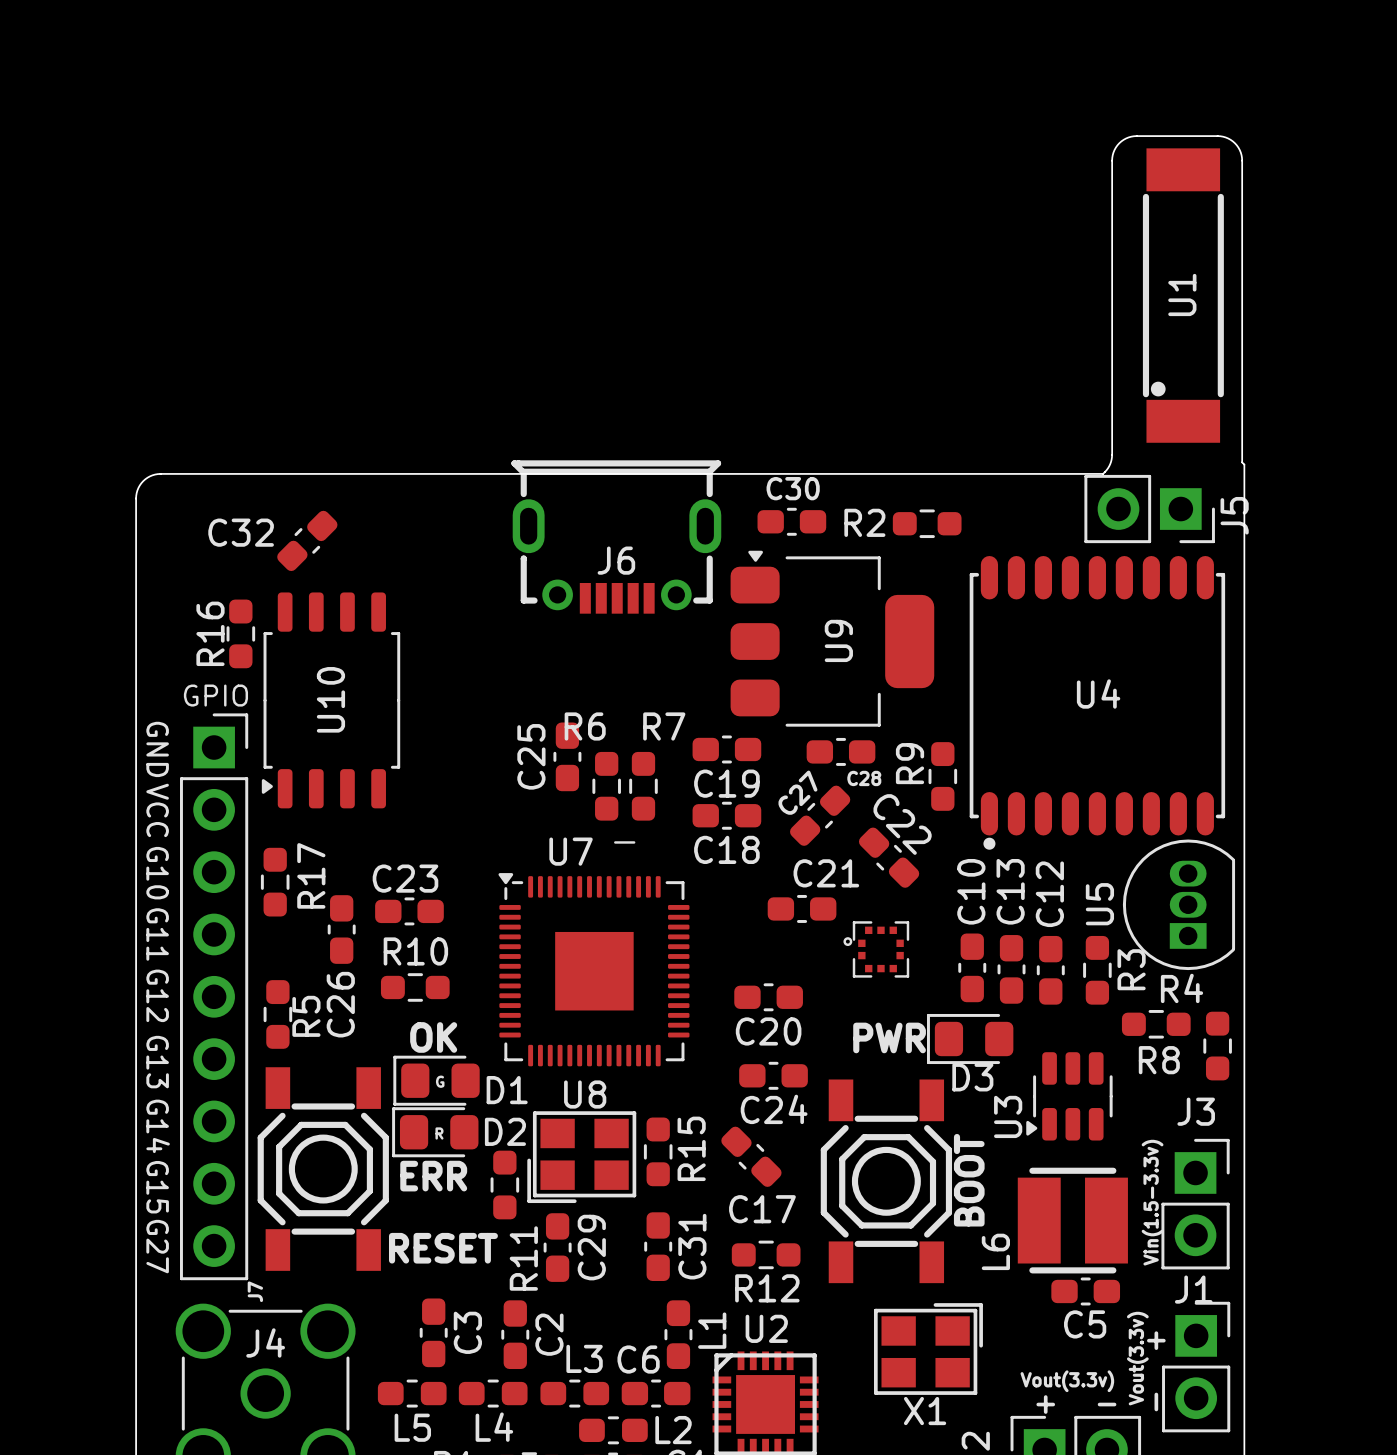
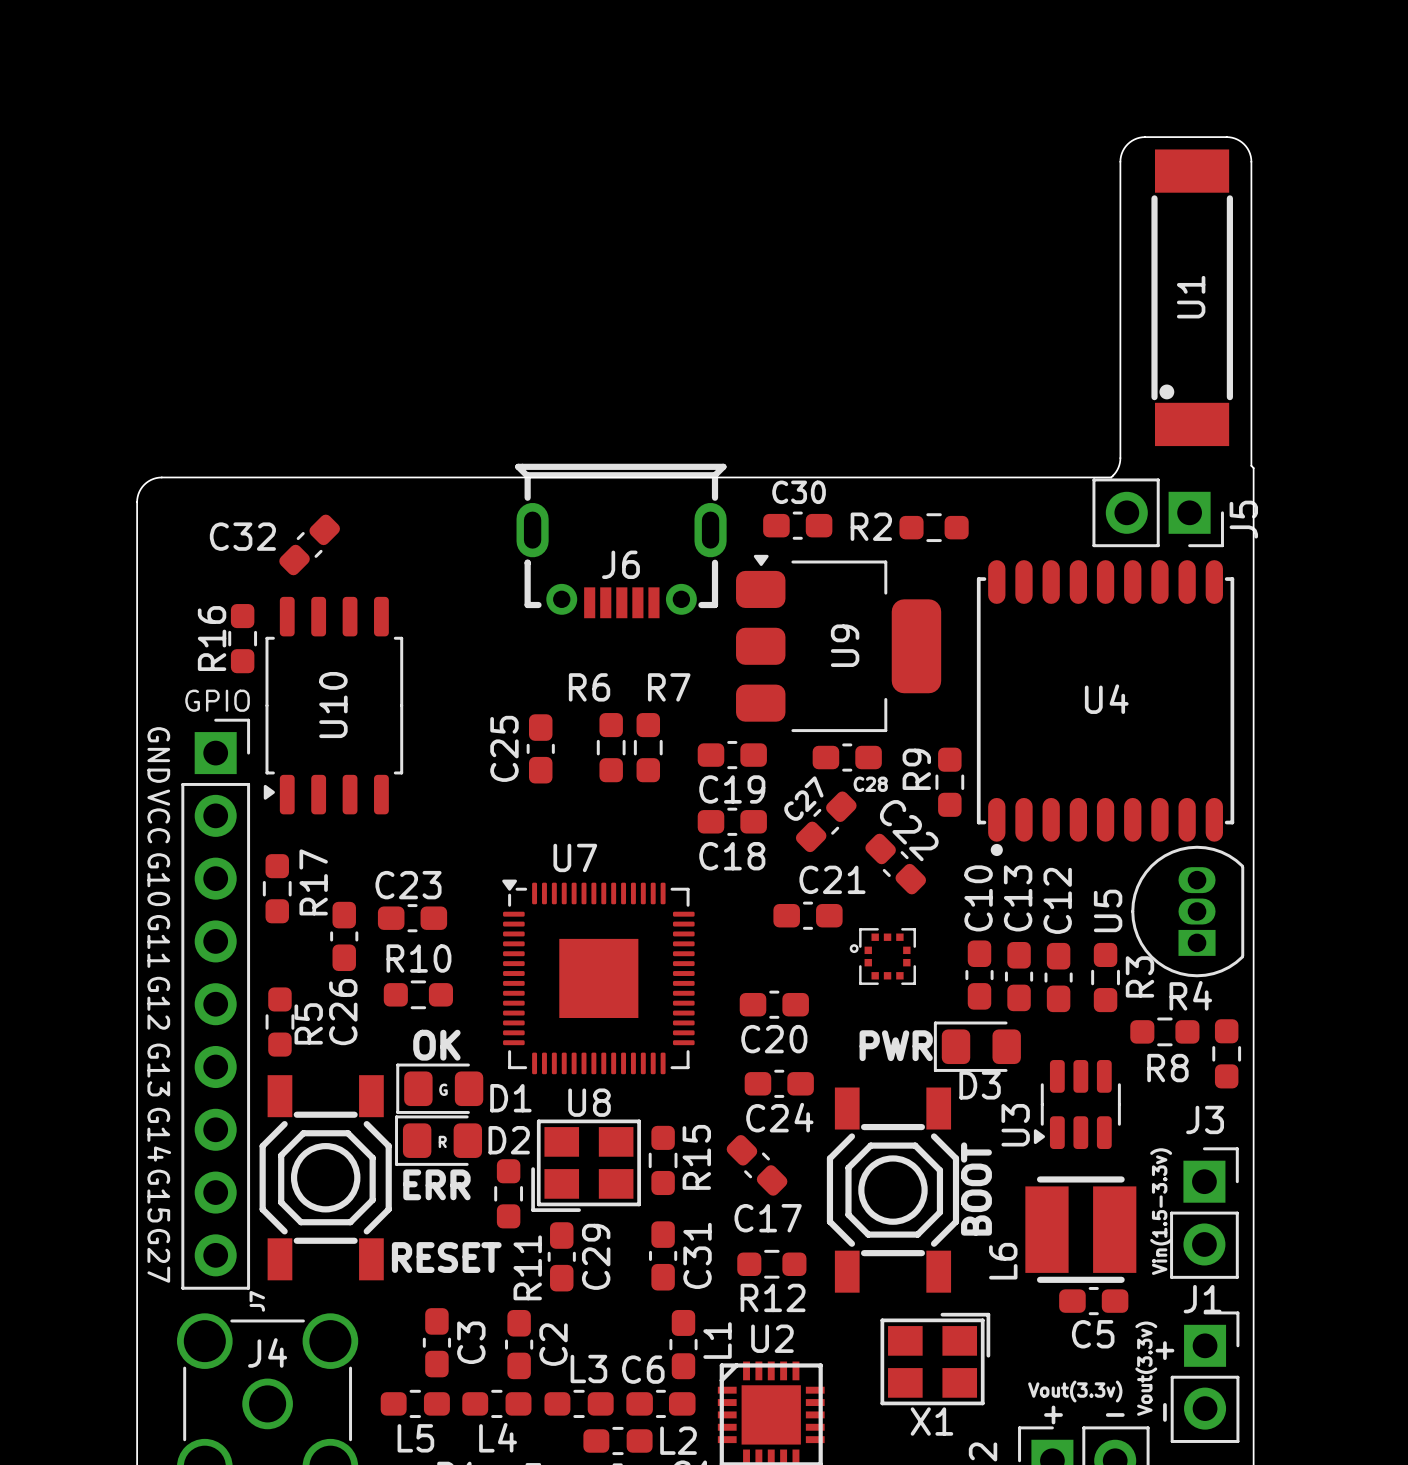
C25 position: (567, 756) -> (540, 748)
R6 position: (606, 786) -> (611, 747)
R7 position: (643, 786) -> (648, 747)
line: (615, 842) (634, 842) -> none

